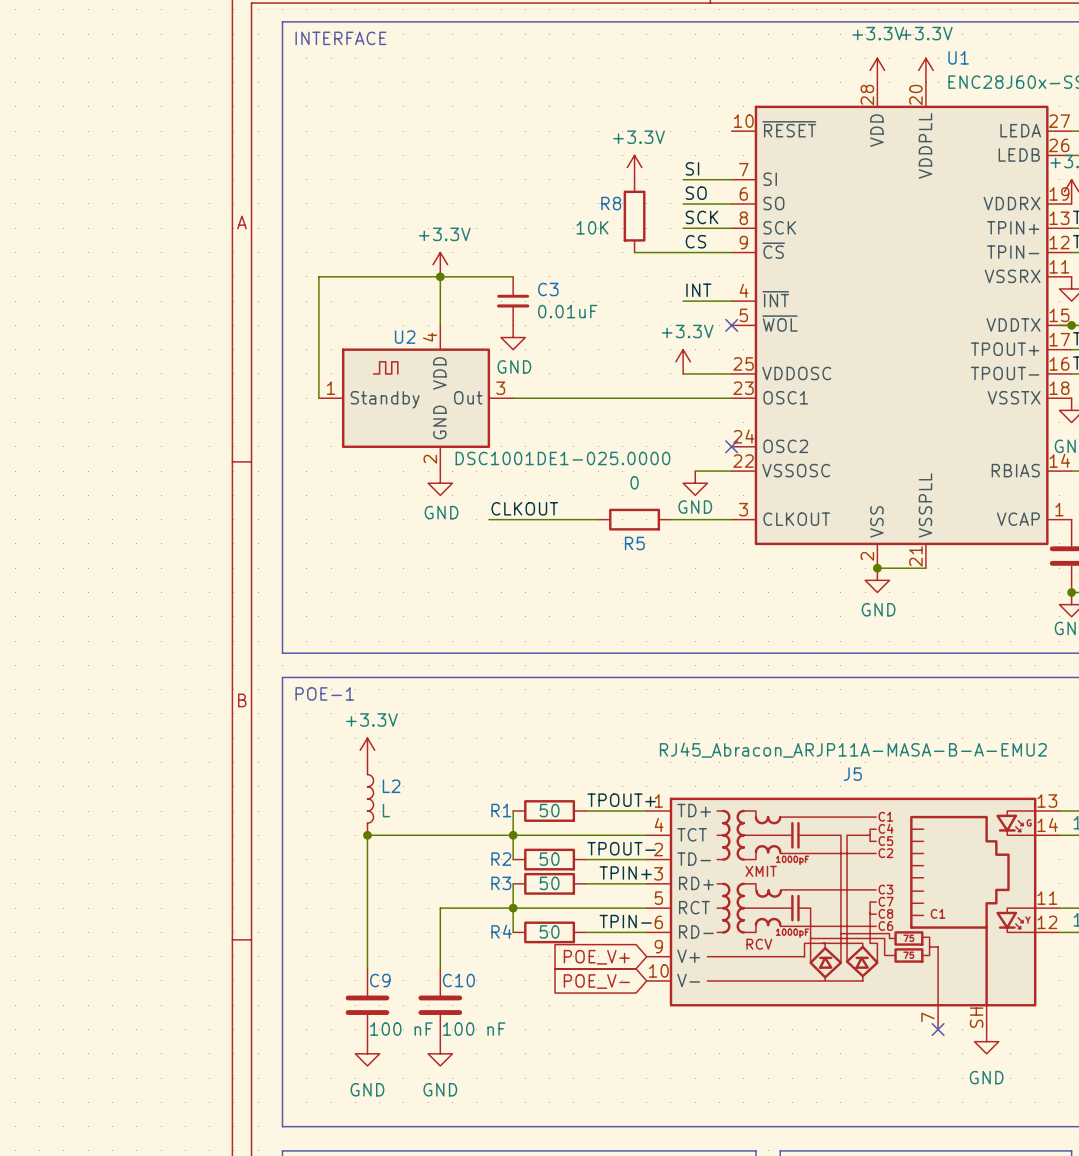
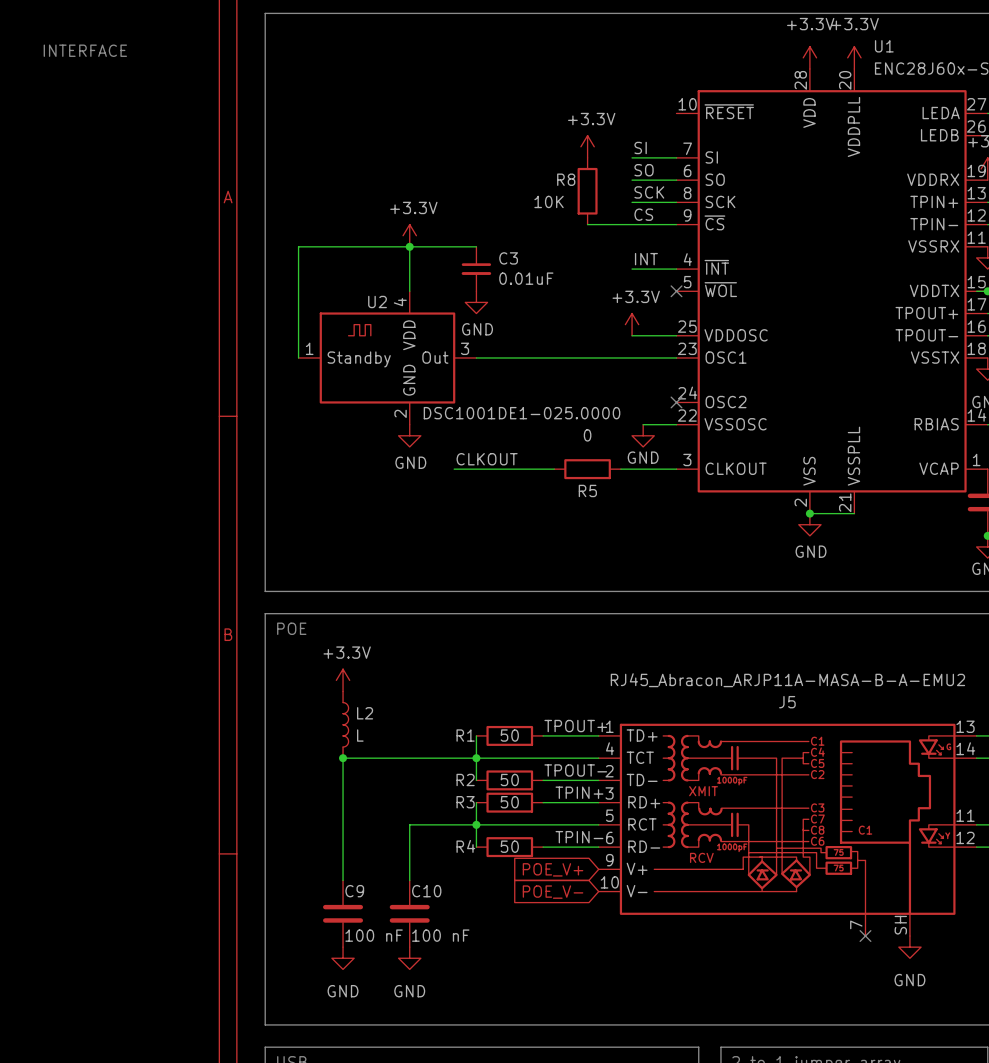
text: INTERFACE (340, 38) -> none
text: none -> INTERFACE (85, 50)
text: POE-1 (324, 693) -> POE (291, 628)

